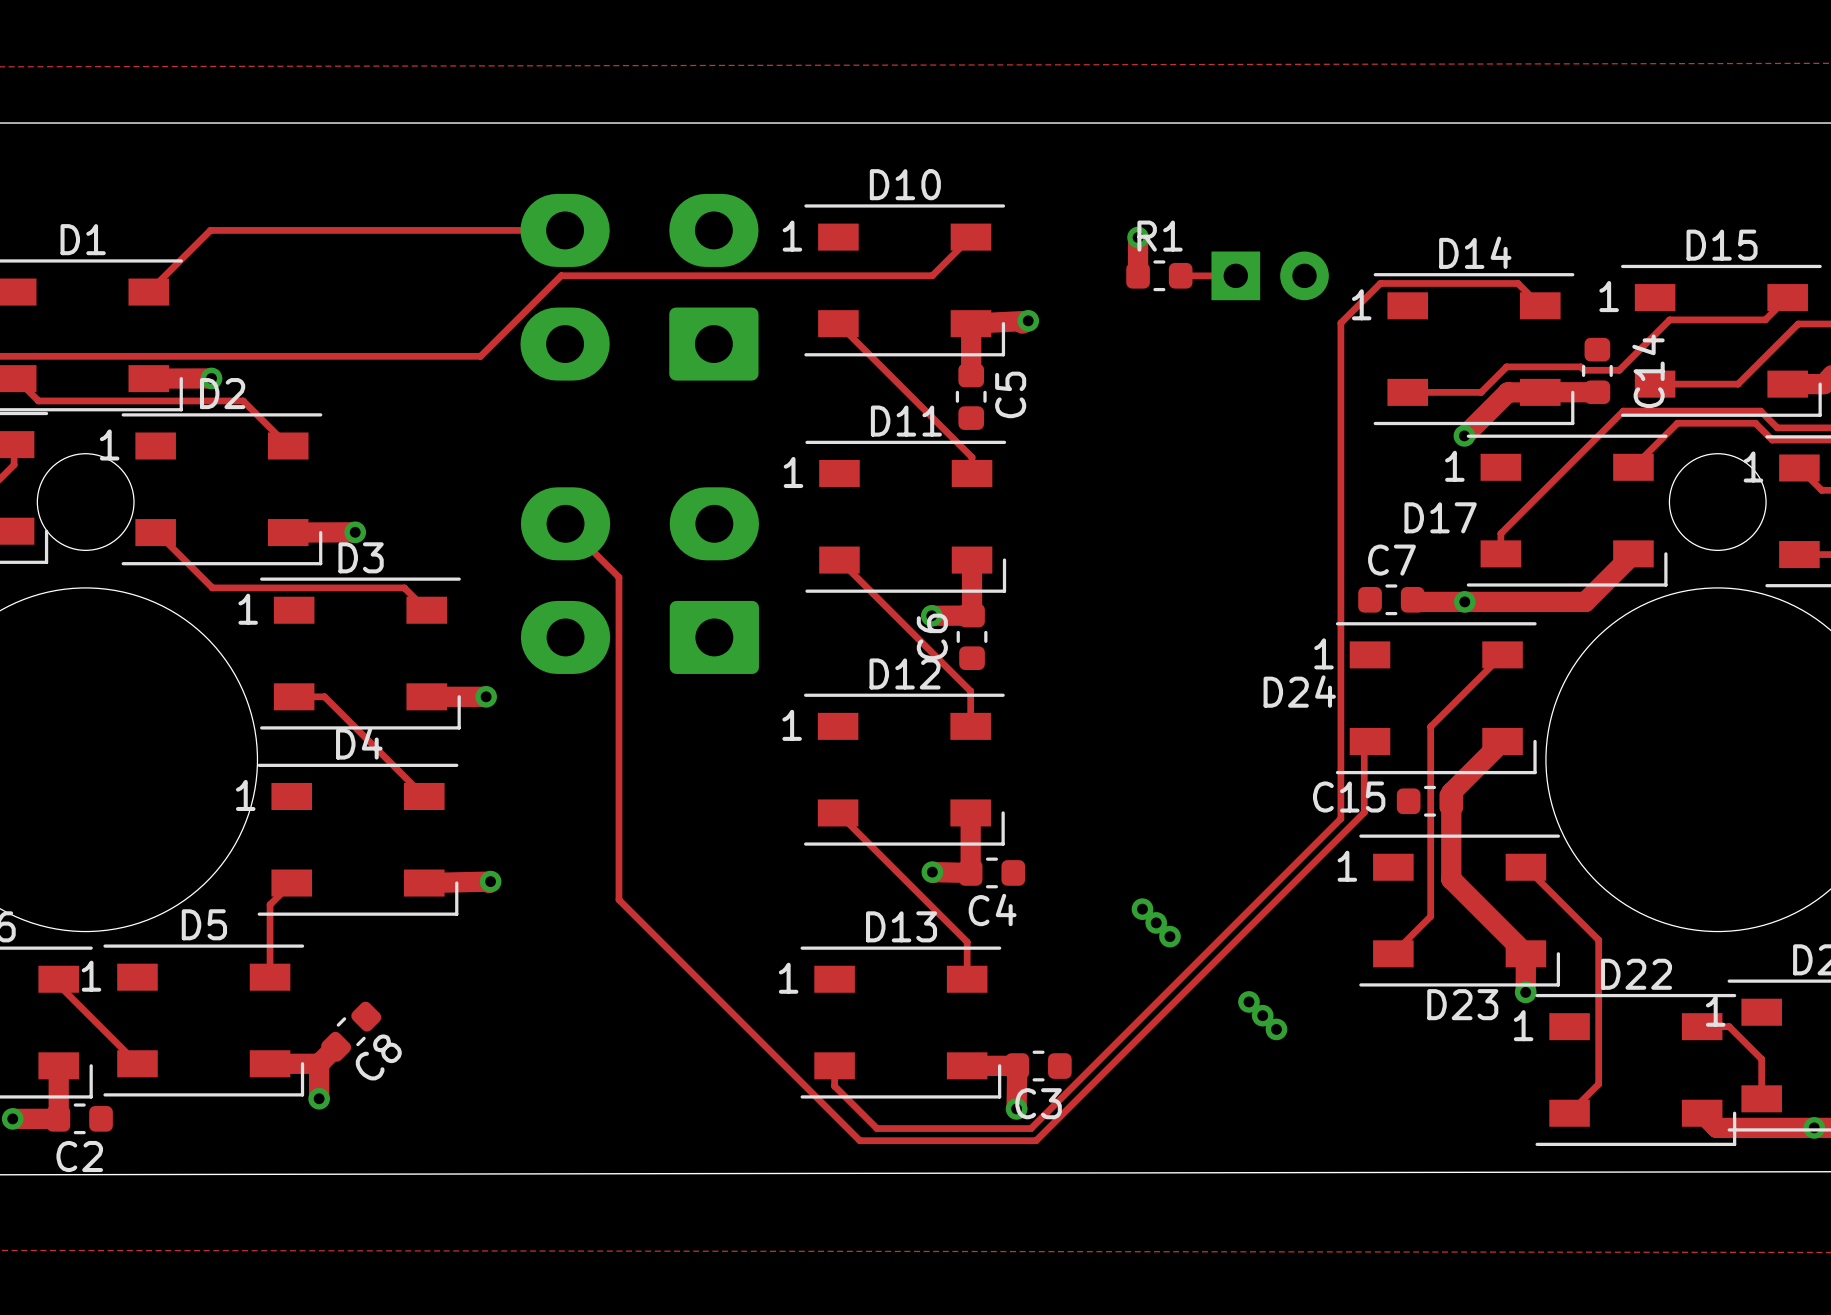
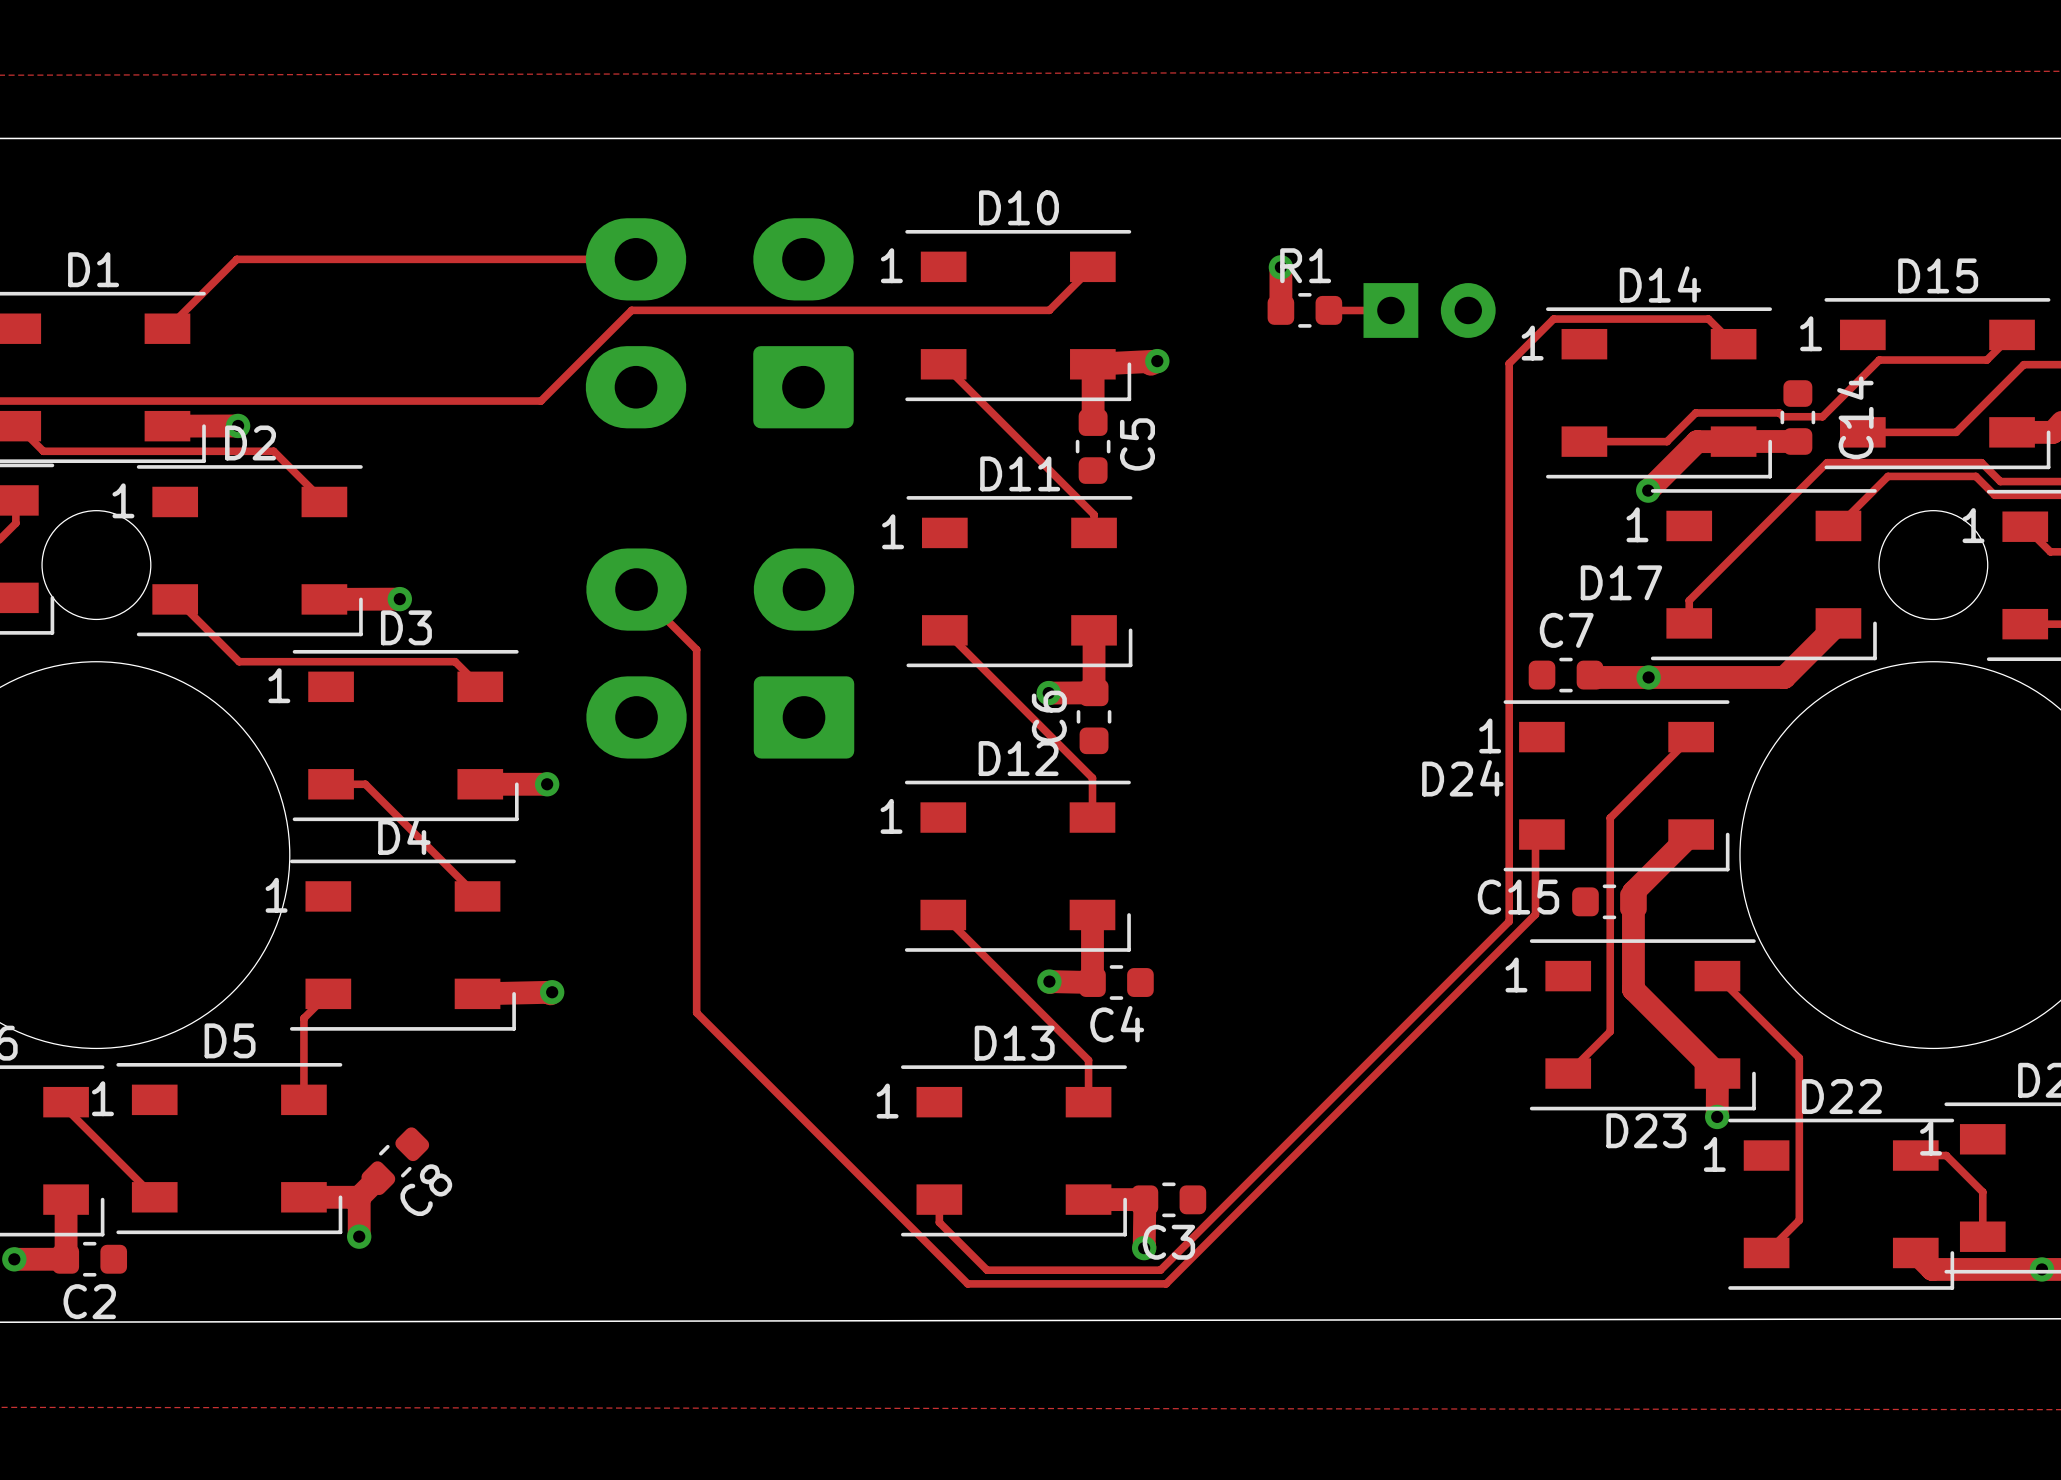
via: (1142, 909) -> none
via: (1156, 922) -> none
via: (1169, 936) -> none
via: (1248, 1001) -> none
via: (1262, 1015) -> none
via: (1276, 1029) -> none

